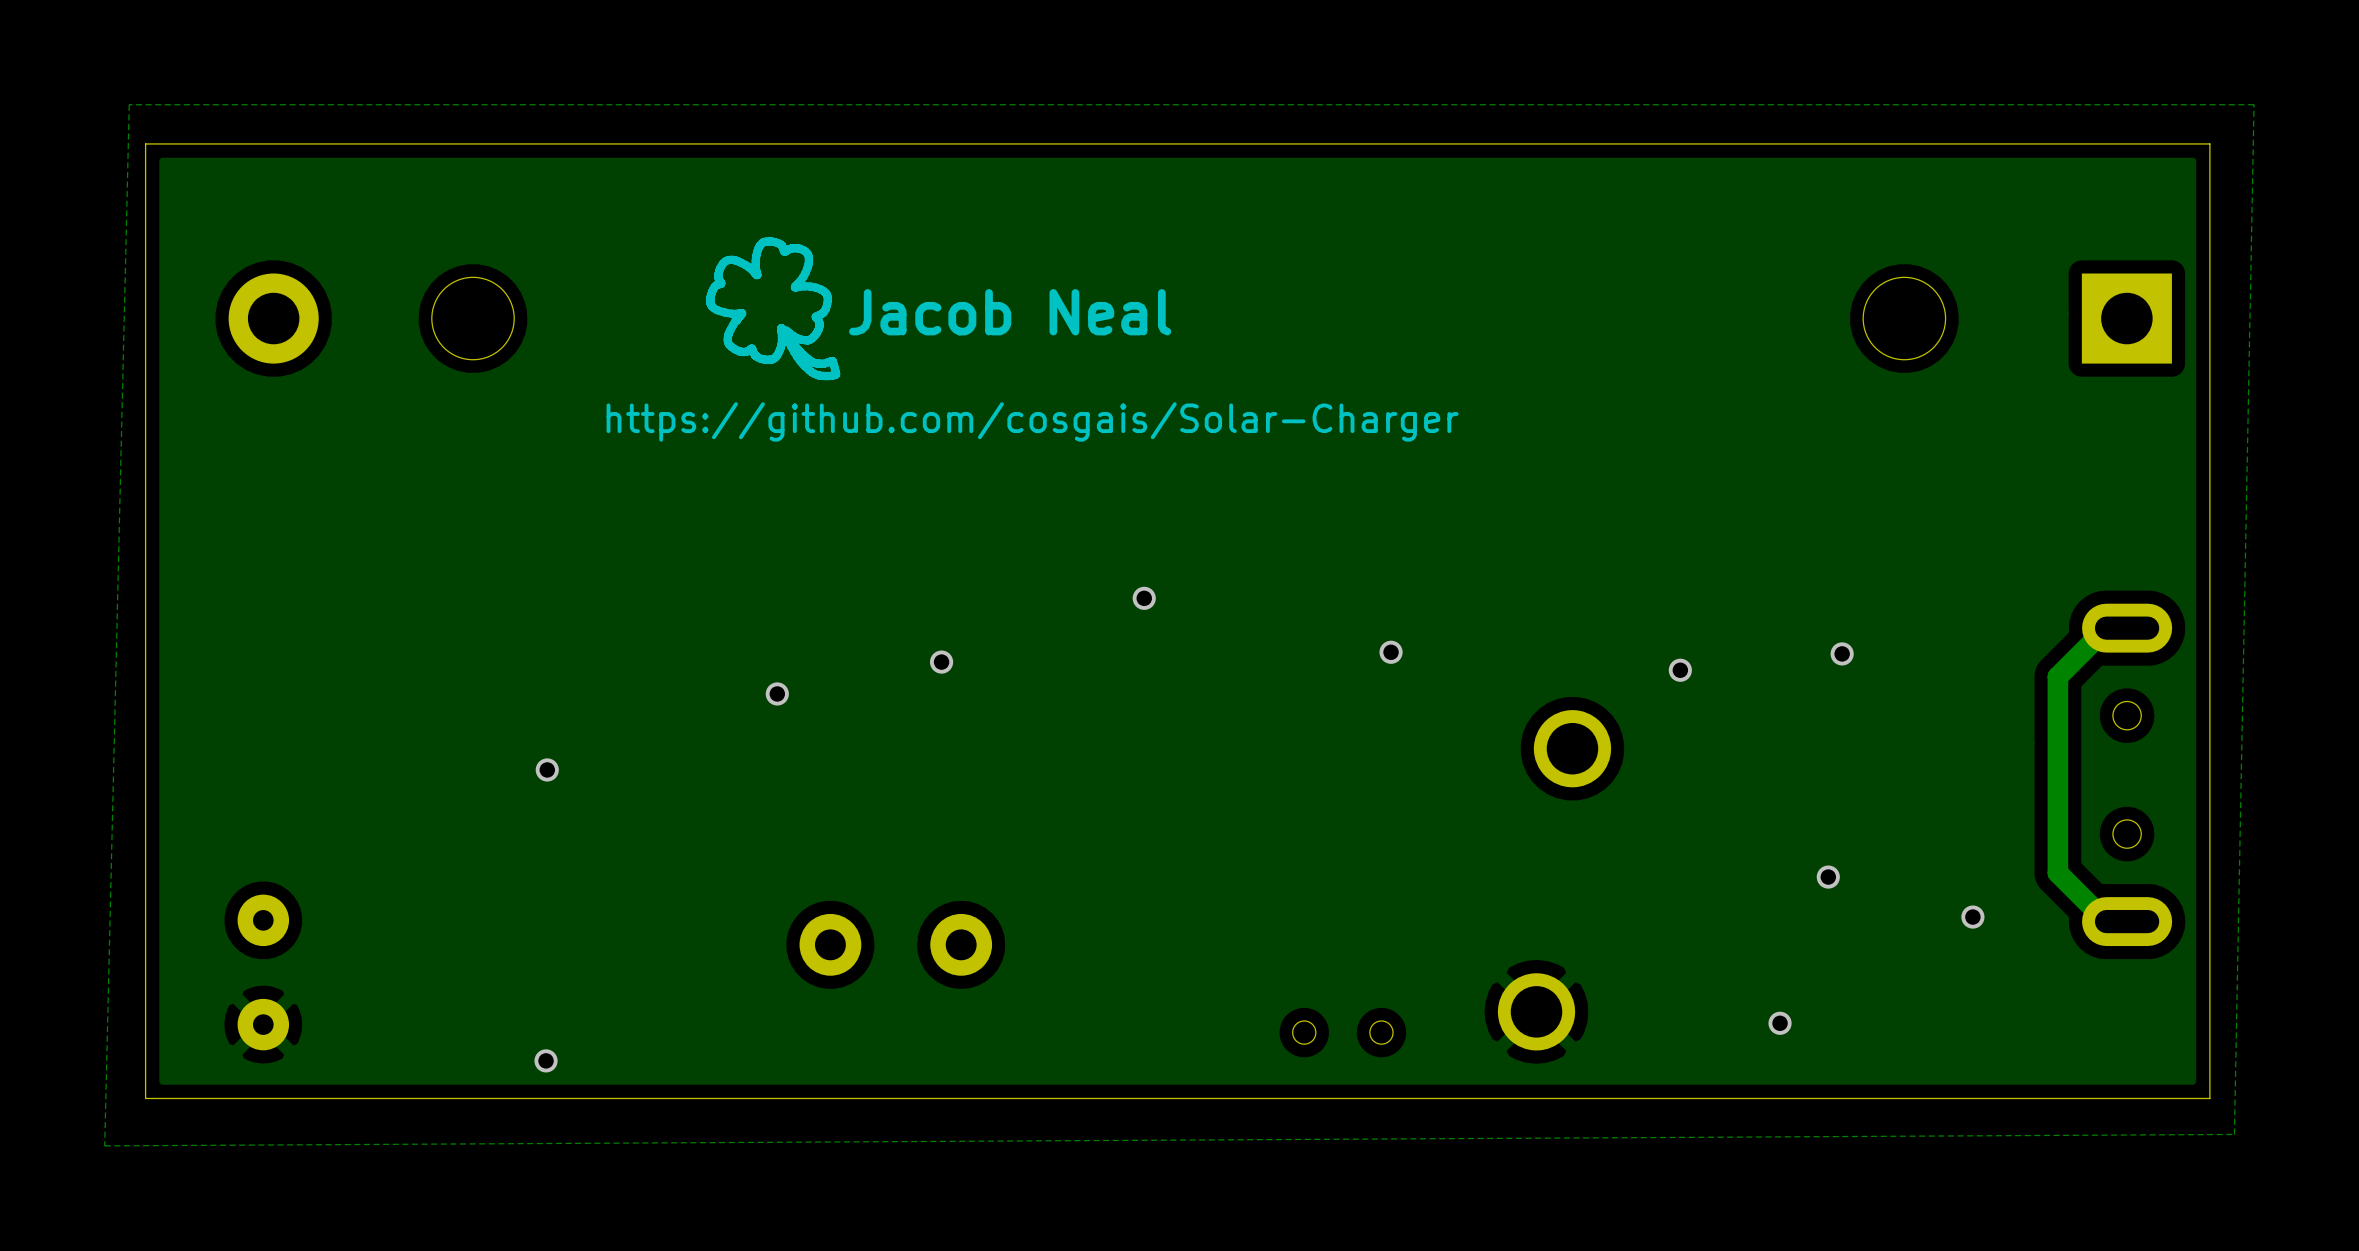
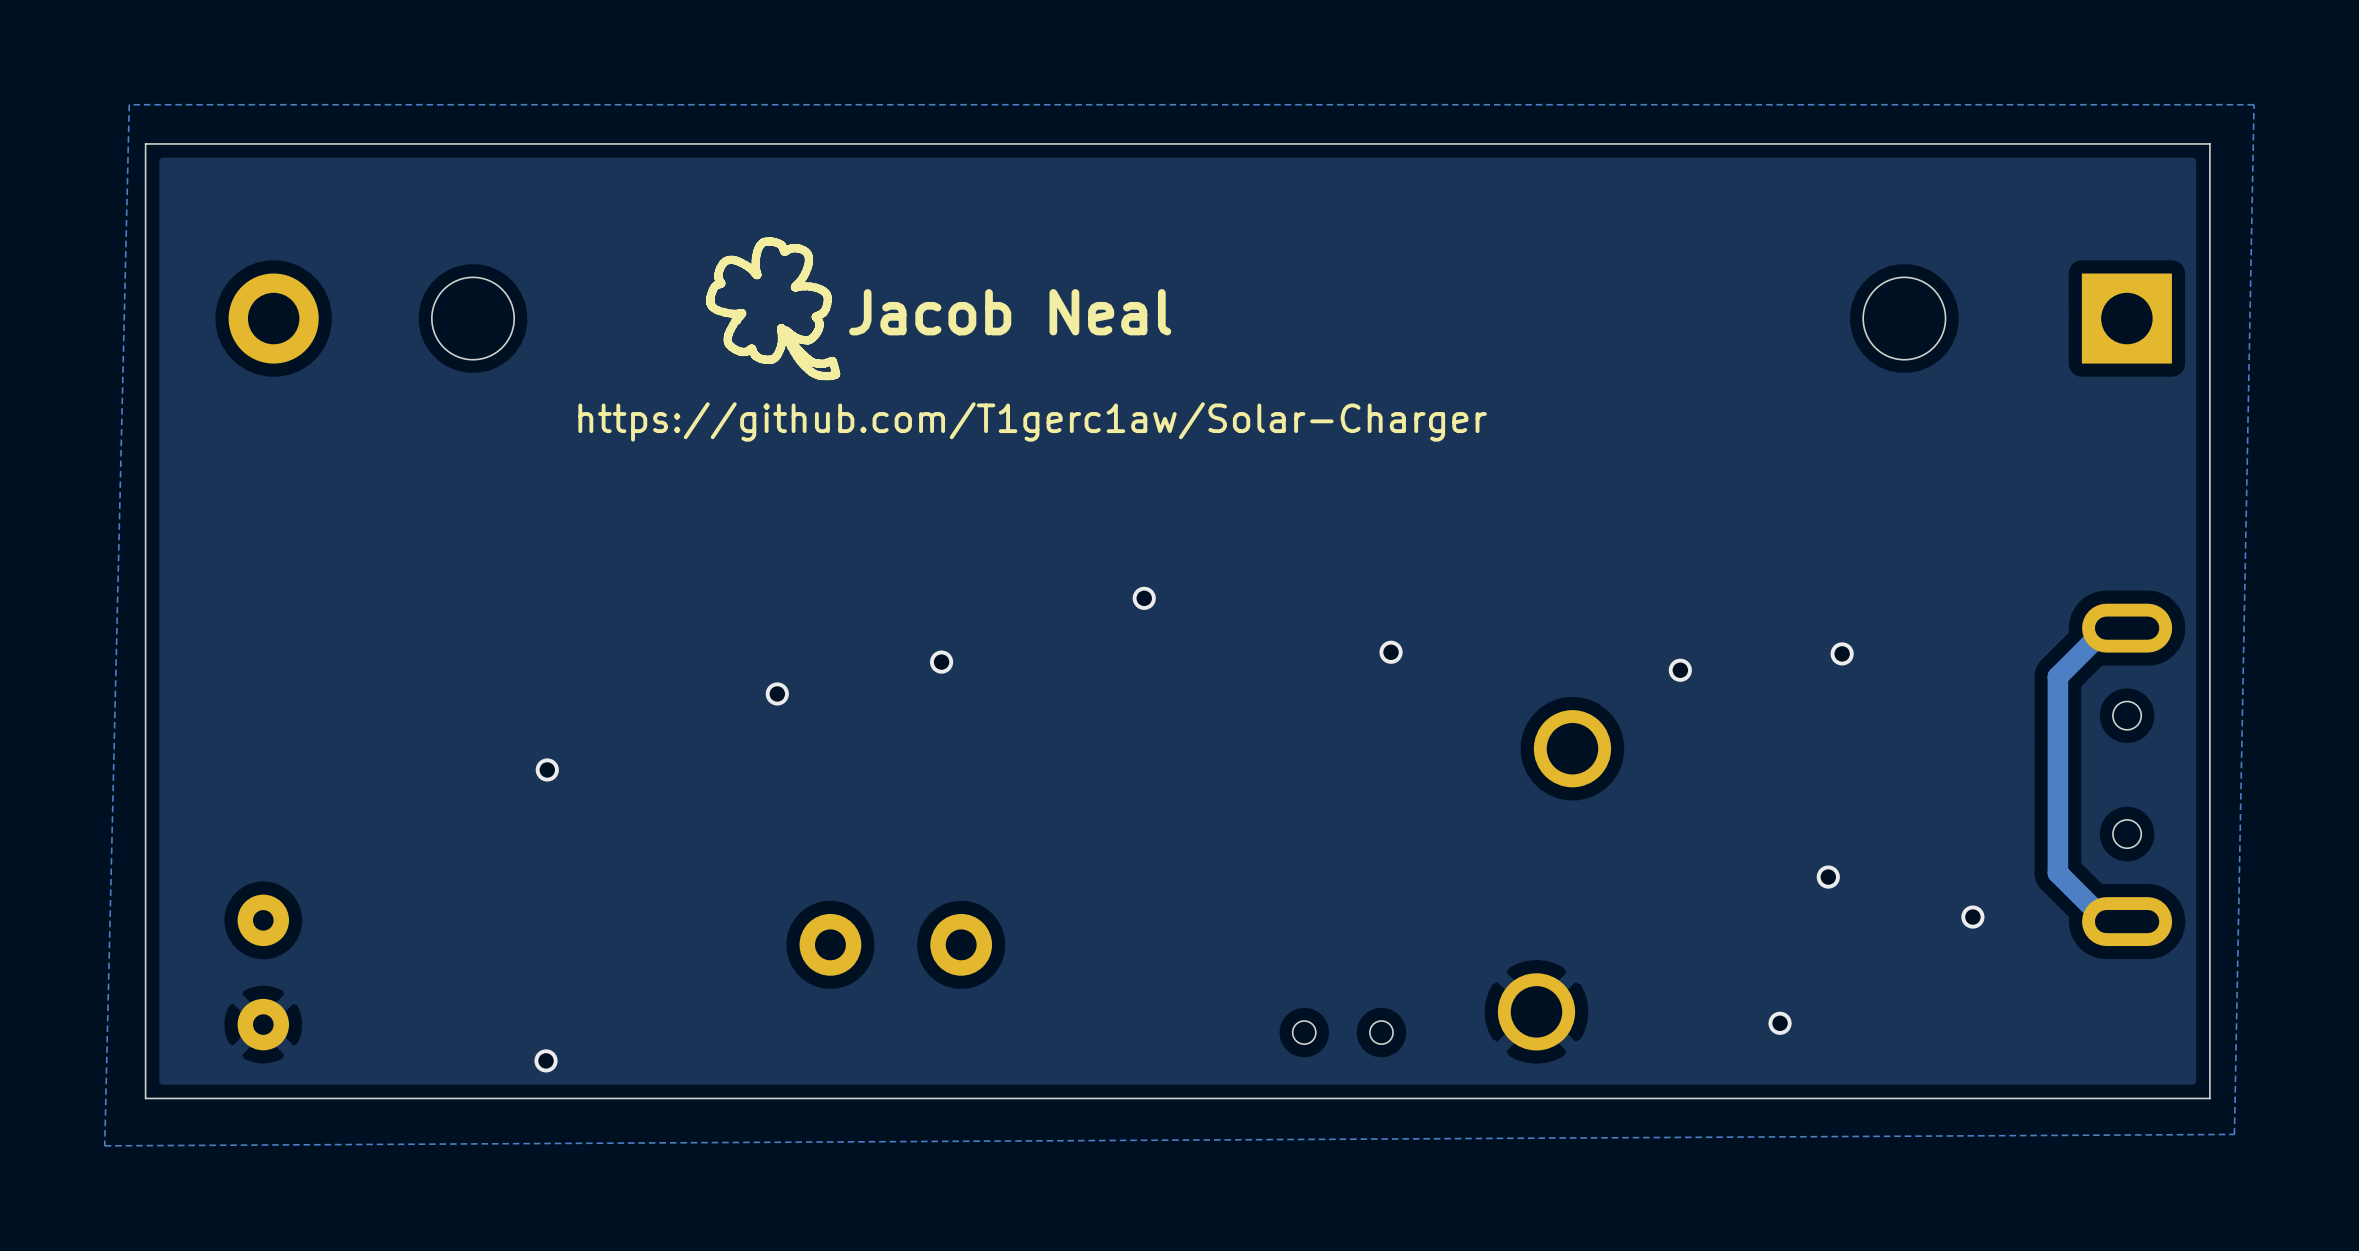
text: https://github.com/cosgais/Solar-Charger (1032, 421) -> https://github.com/T1gerc1aw/Solar-Charger (1032, 421)

